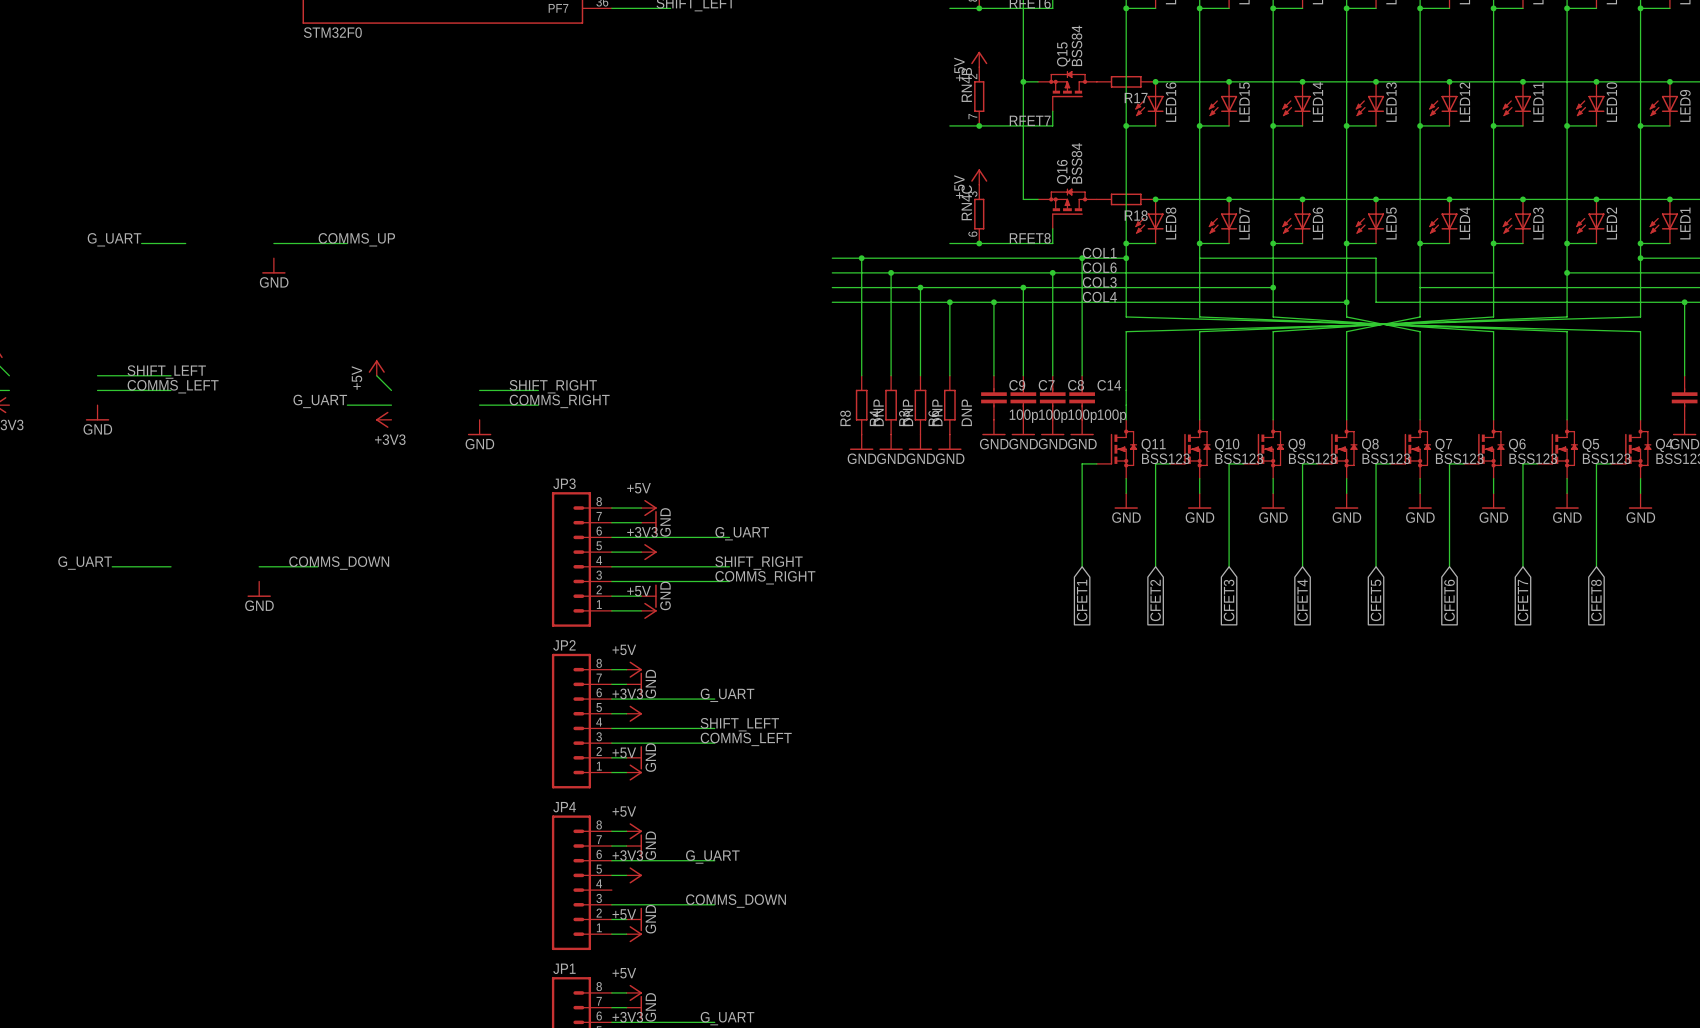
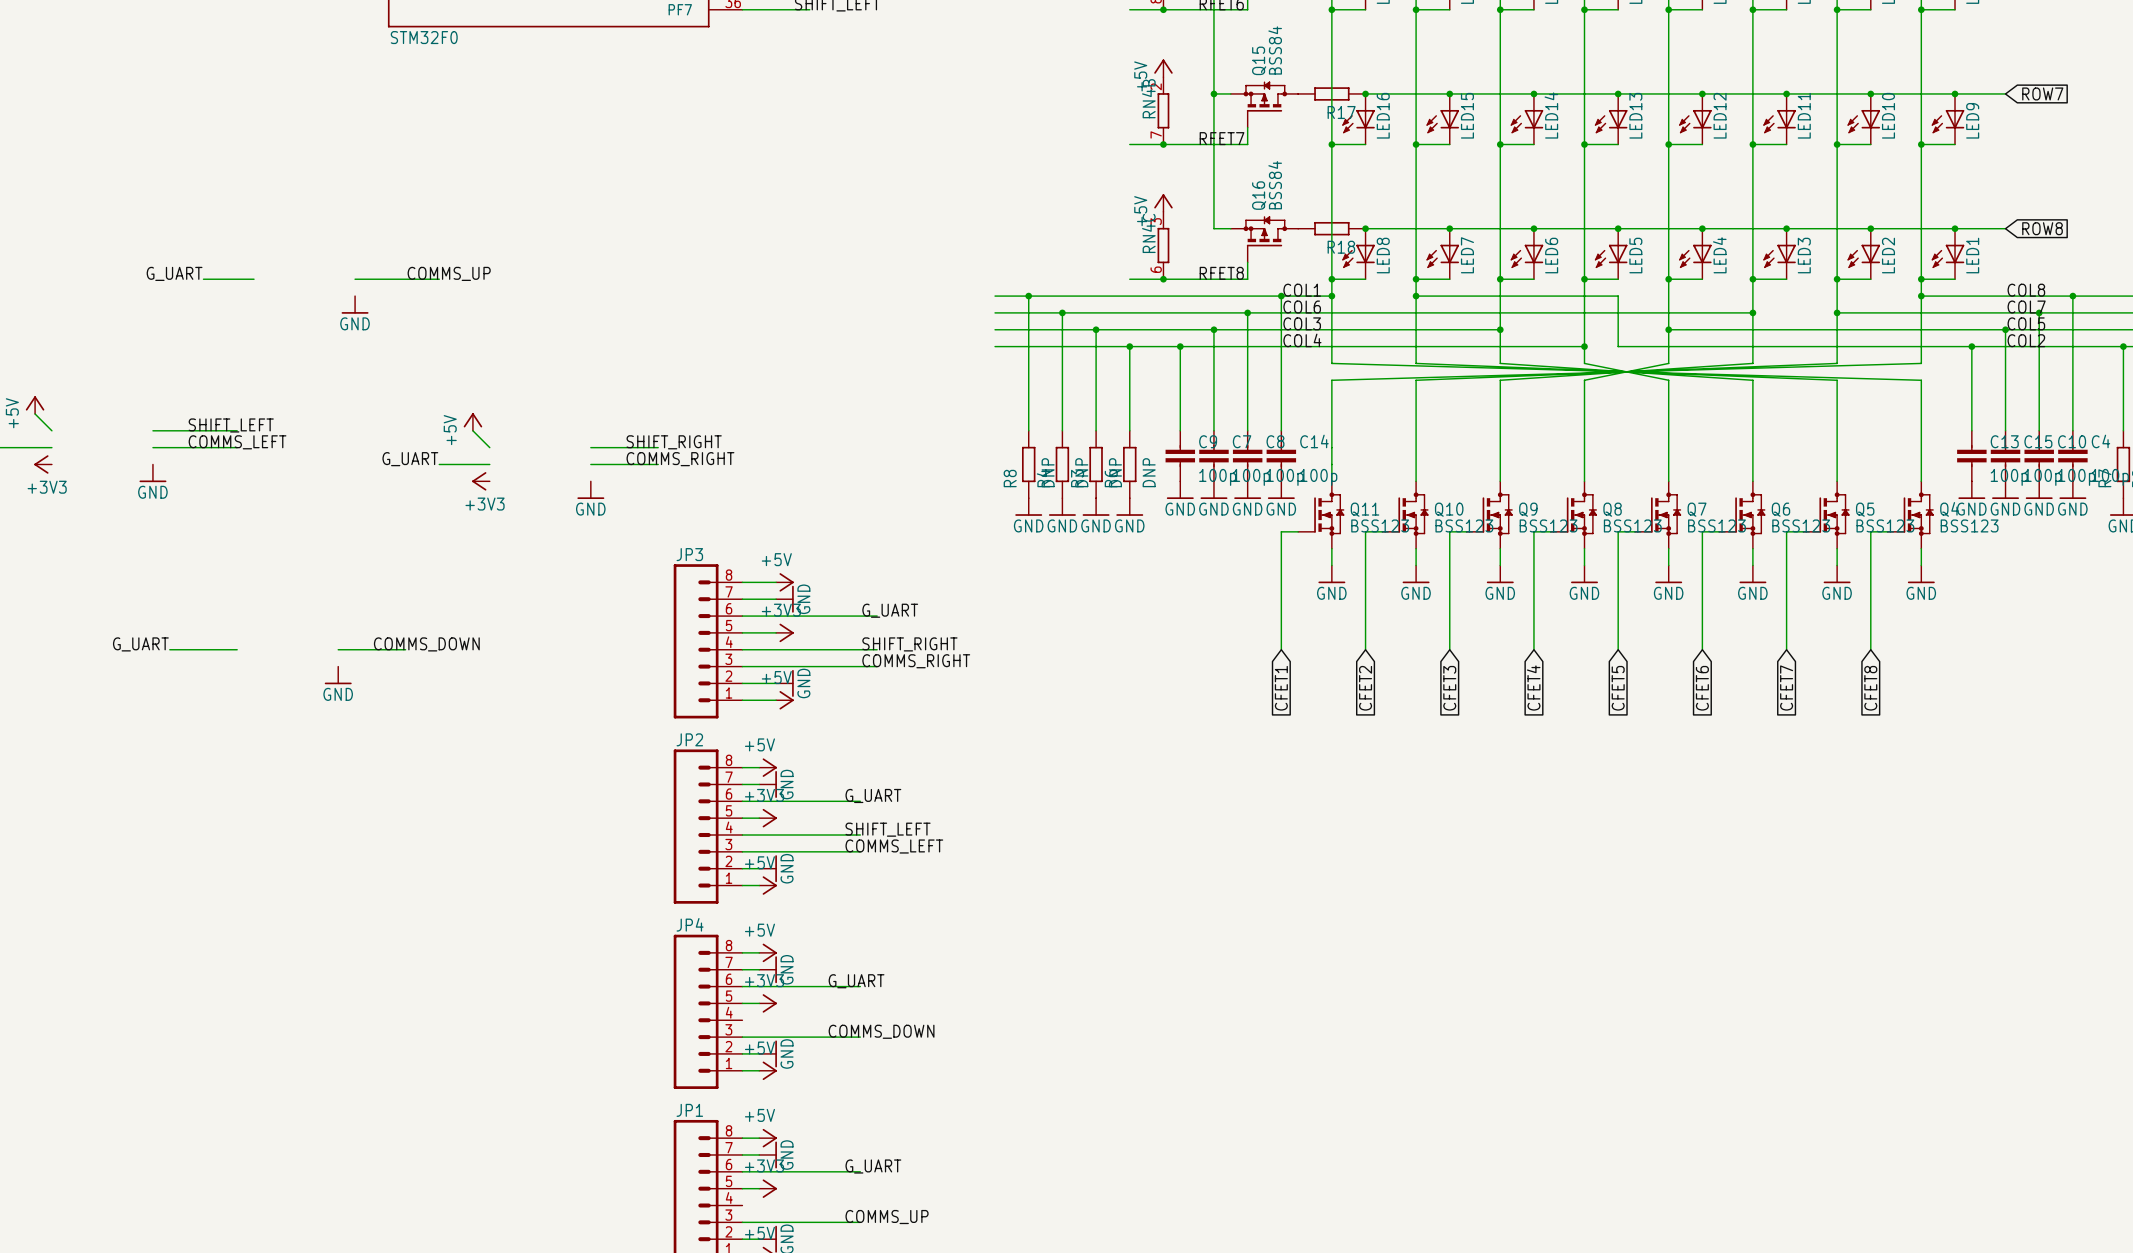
junction: none -> (1416, 296)
junction: none -> (1752, 312)
junction: none -> (1668, 329)

